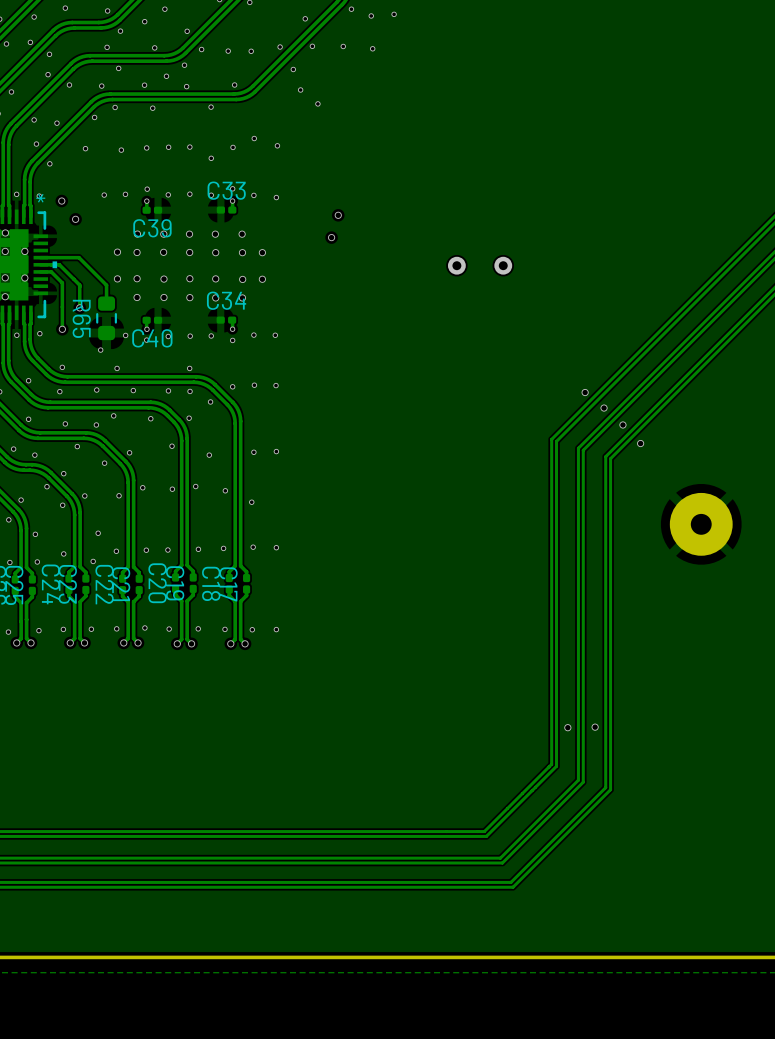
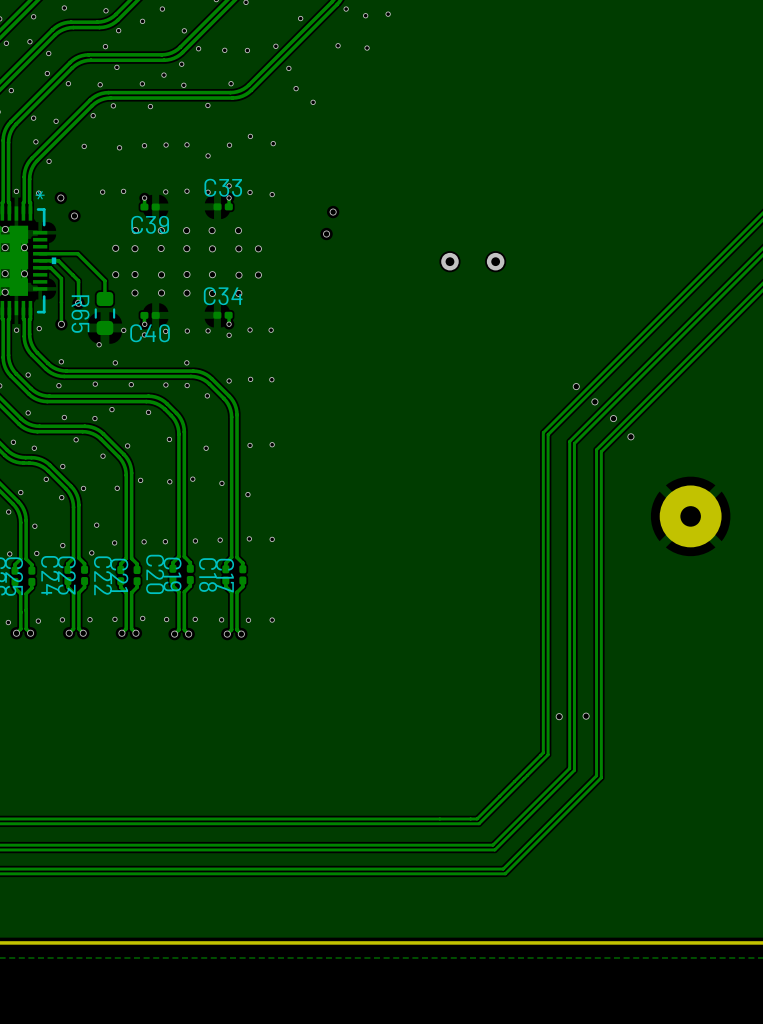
via: (312, 46) -> none
via: (154, 47) -> none
via: (147, 189) -> none
via: (189, 418) -> none

